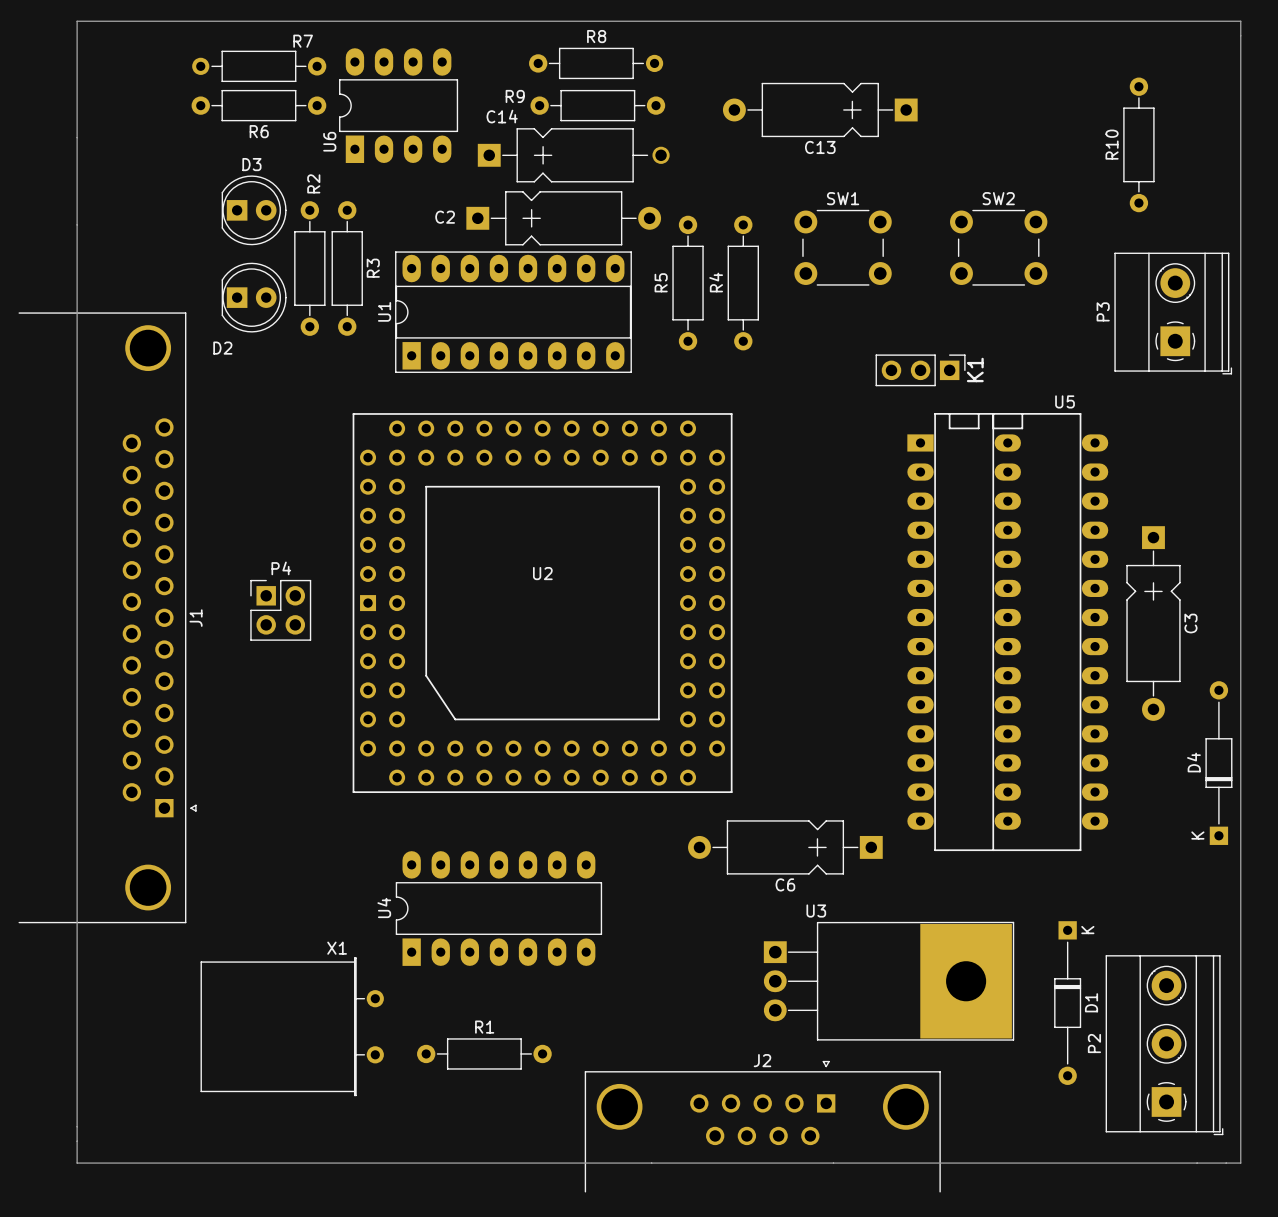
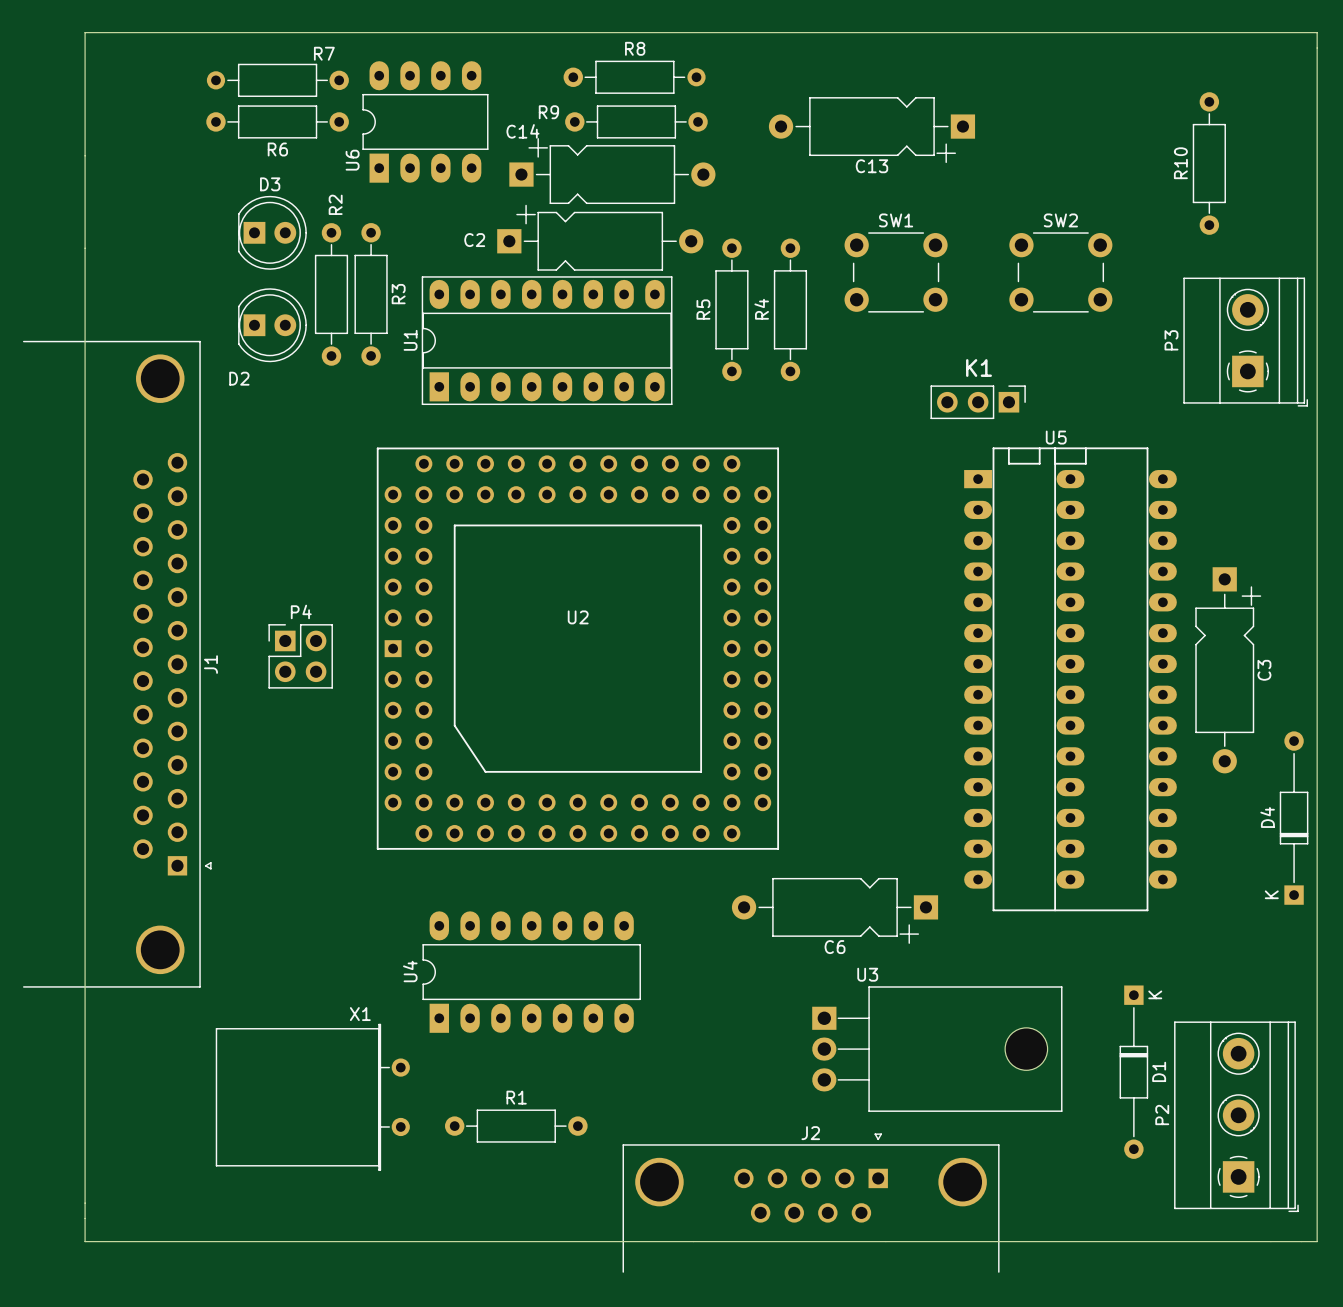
C13 footprint: [722, 82, 918, 138] -> [768, 97, 976, 164]
C14 footprint: [477, 128, 670, 183] -> [509, 138, 716, 205]
C2 footprint: [466, 191, 662, 246] -> [497, 204, 704, 271]
K1 name rotation: 0° (975, 370) -> 90° clockwise (979, 368)
K1 name position: K1 (975, 370) -> K1 (979, 368)
U5 name position: U5 (1065, 401) -> U5 (1056, 437)
C3 footprint: [1126, 526, 1181, 721] -> [1195, 567, 1262, 774]
C6 footprint: [688, 820, 883, 875] -> [731, 877, 939, 944]
U3 footprint: [763, 921, 1015, 1041] -> [812, 986, 1063, 1112]

